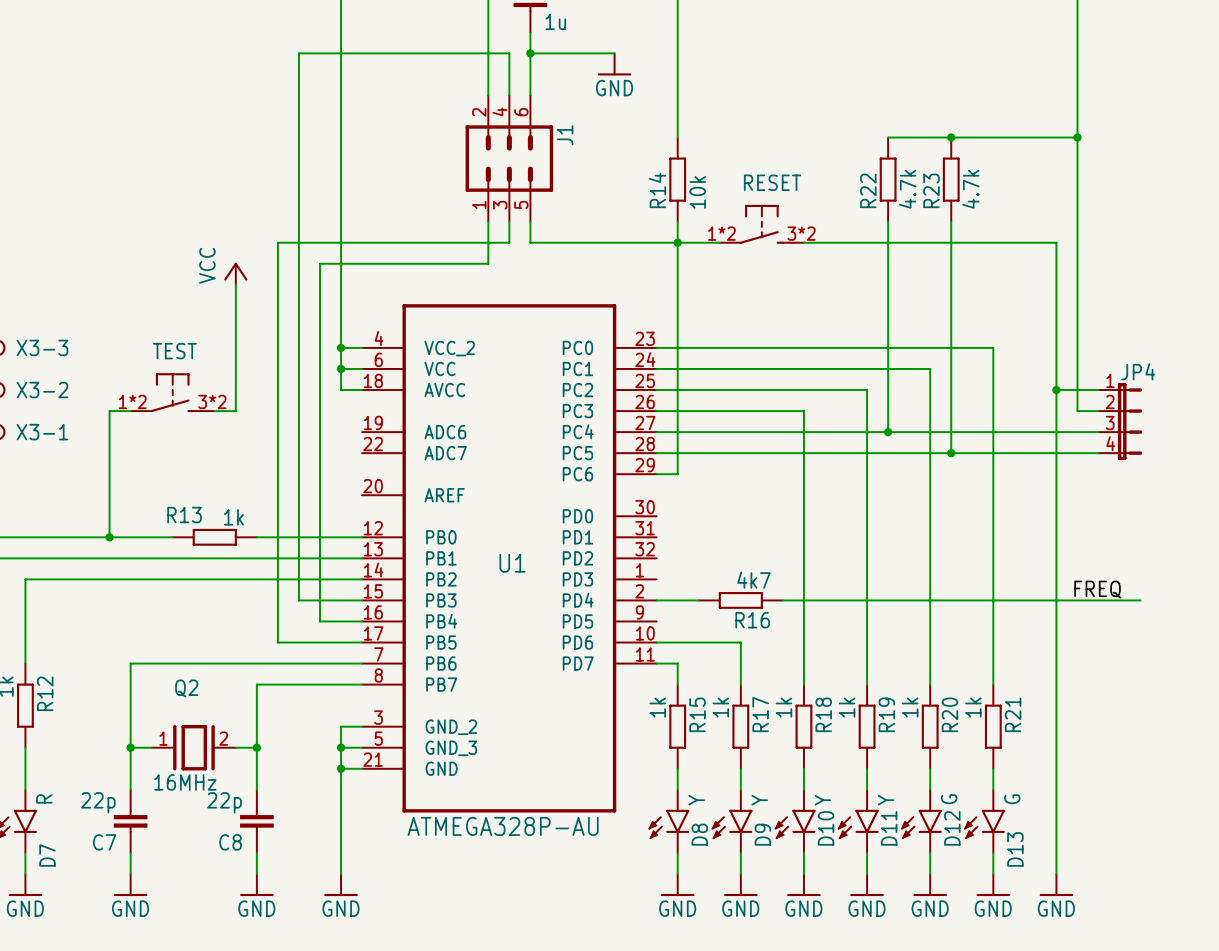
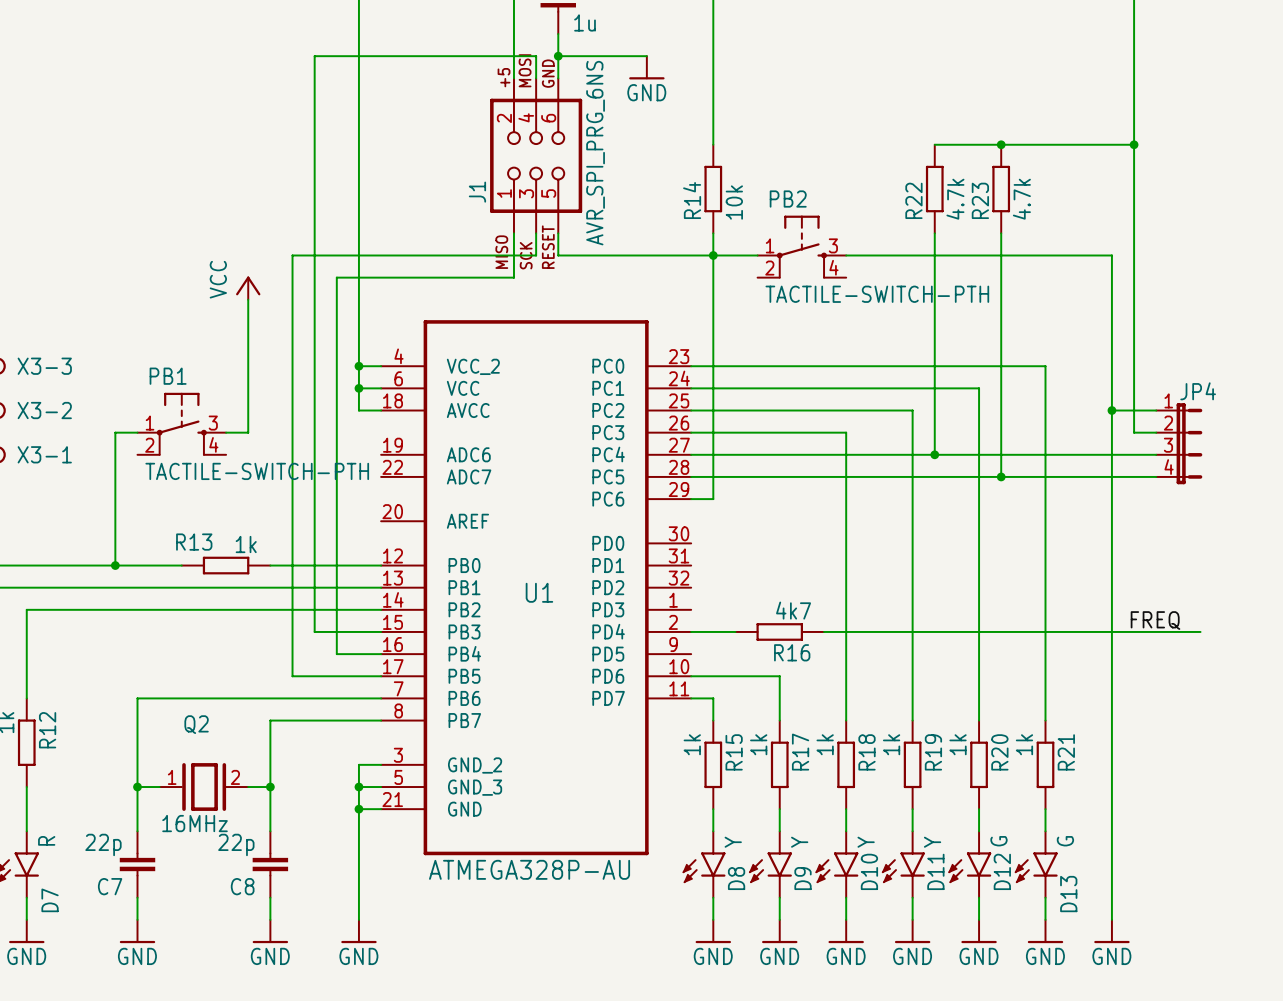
J1 symbol: [465, 95, 554, 222] -> [490, 78, 583, 234]
J1 name position: J1 (565, 135) -> J1 (477, 192)
J1 value: none -> AVR_SPI_PRG_6NS (595, 153)
RESET: (761, 224) -> none
PB2: none -> TACTILE-SWITCH-PTH (801, 246)
TEST: (172, 392) -> none
PB1: none -> TACTILE-SWITCH-PTH (181, 424)

